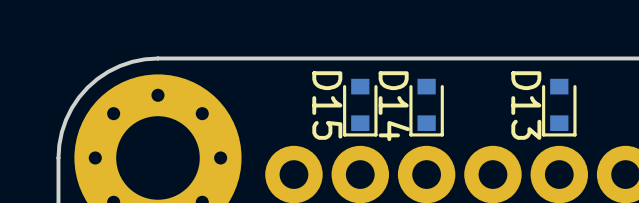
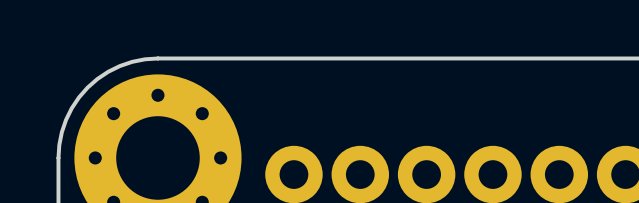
D15: (360, 107) -> none
D14: (426, 107) -> none
D13: (559, 107) -> none

